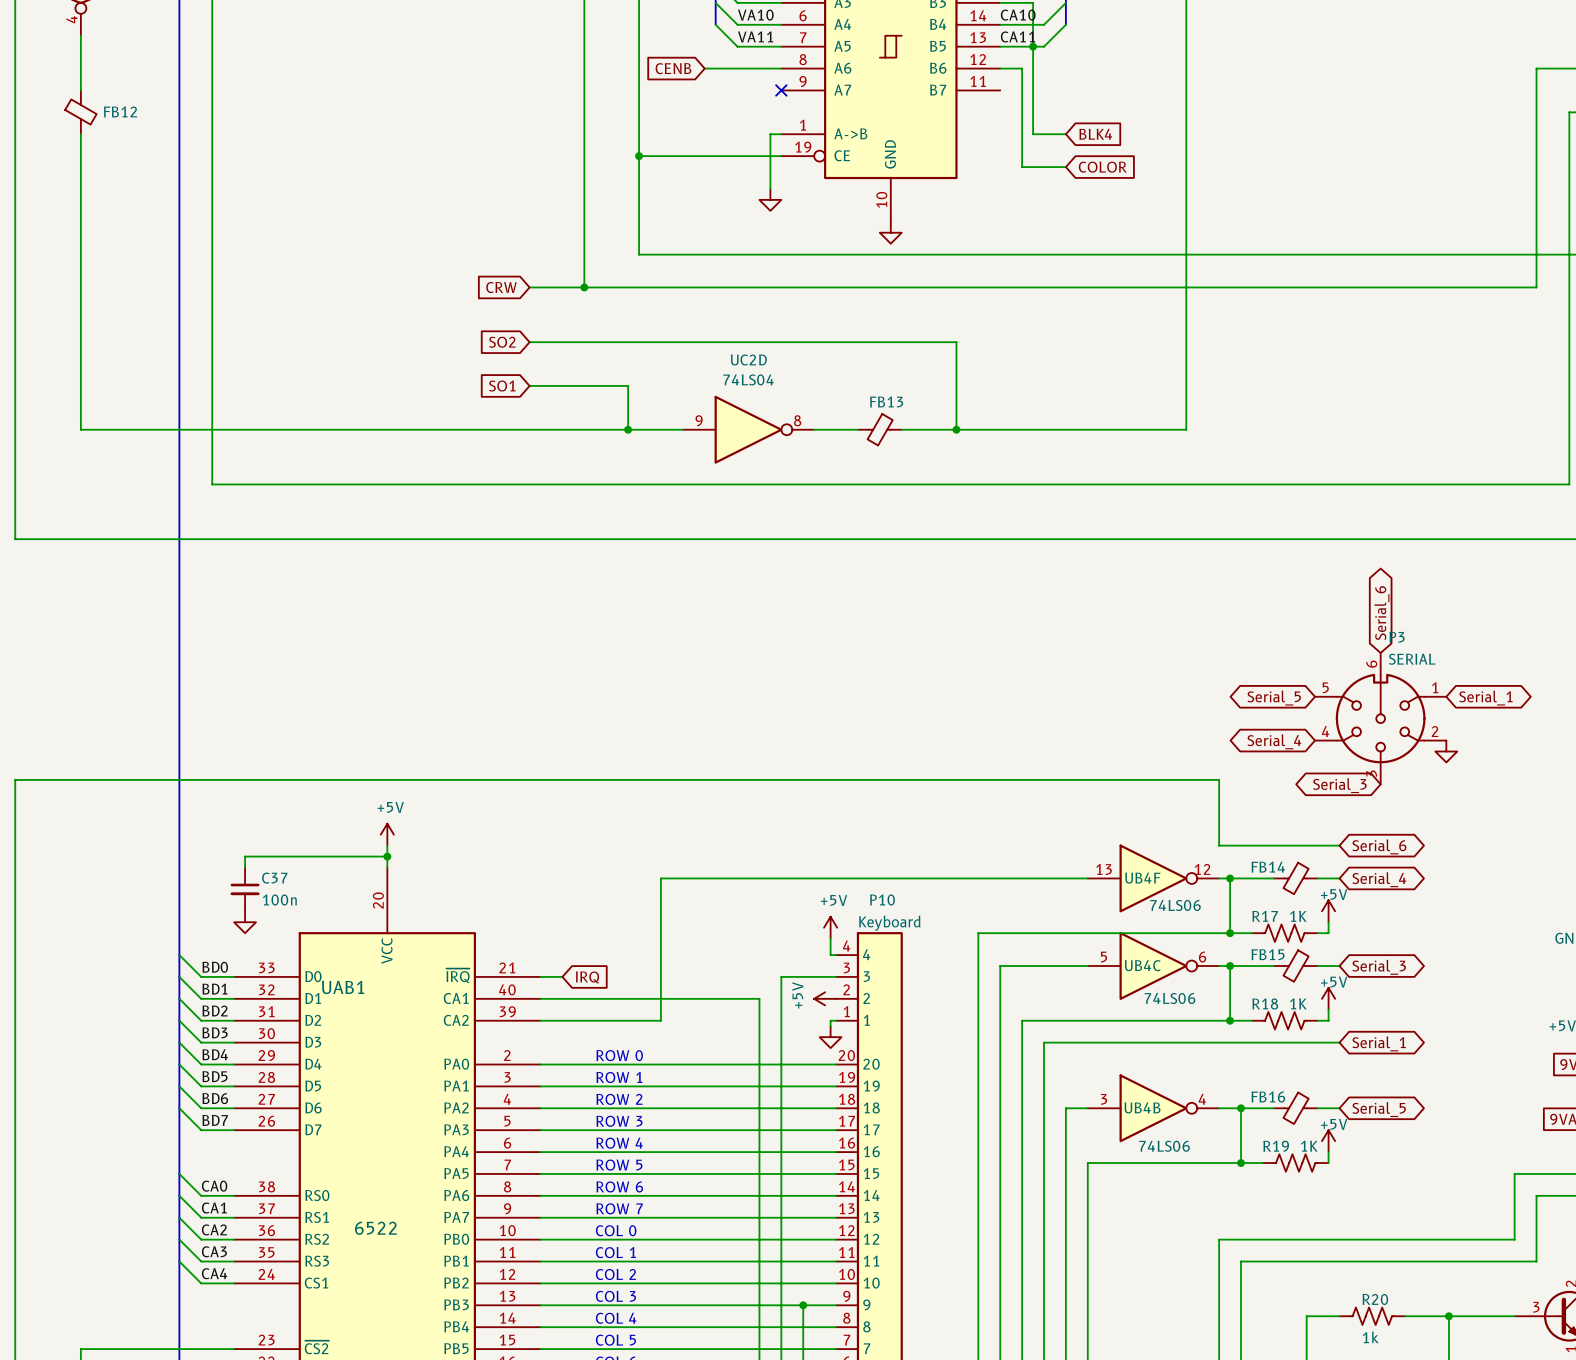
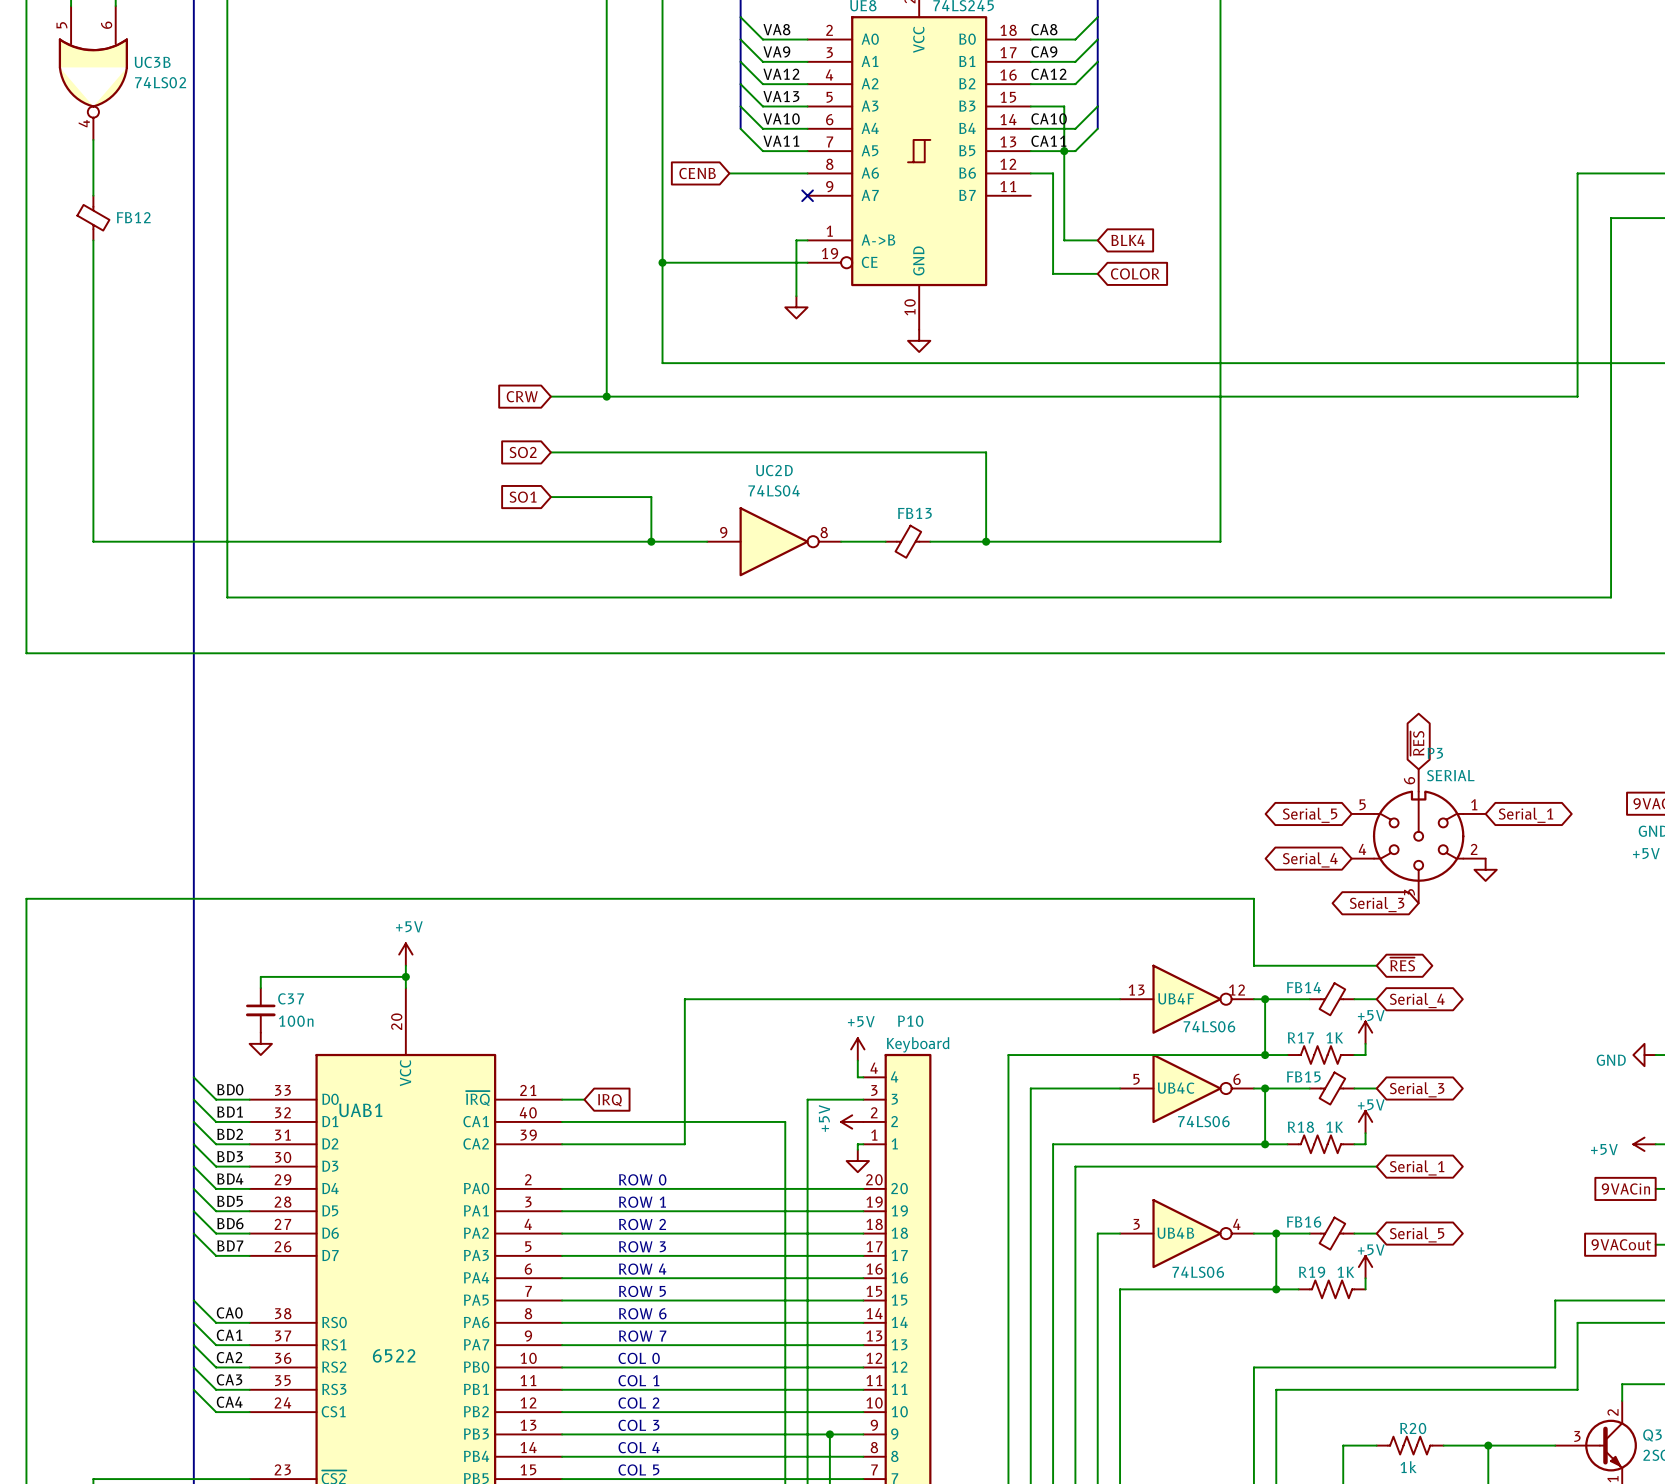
global label: Serial_6 (1381, 613) -> ~{RES} (1417, 743)
global label: Serial_6 (1379, 846) -> ~{RES} (1402, 964)

